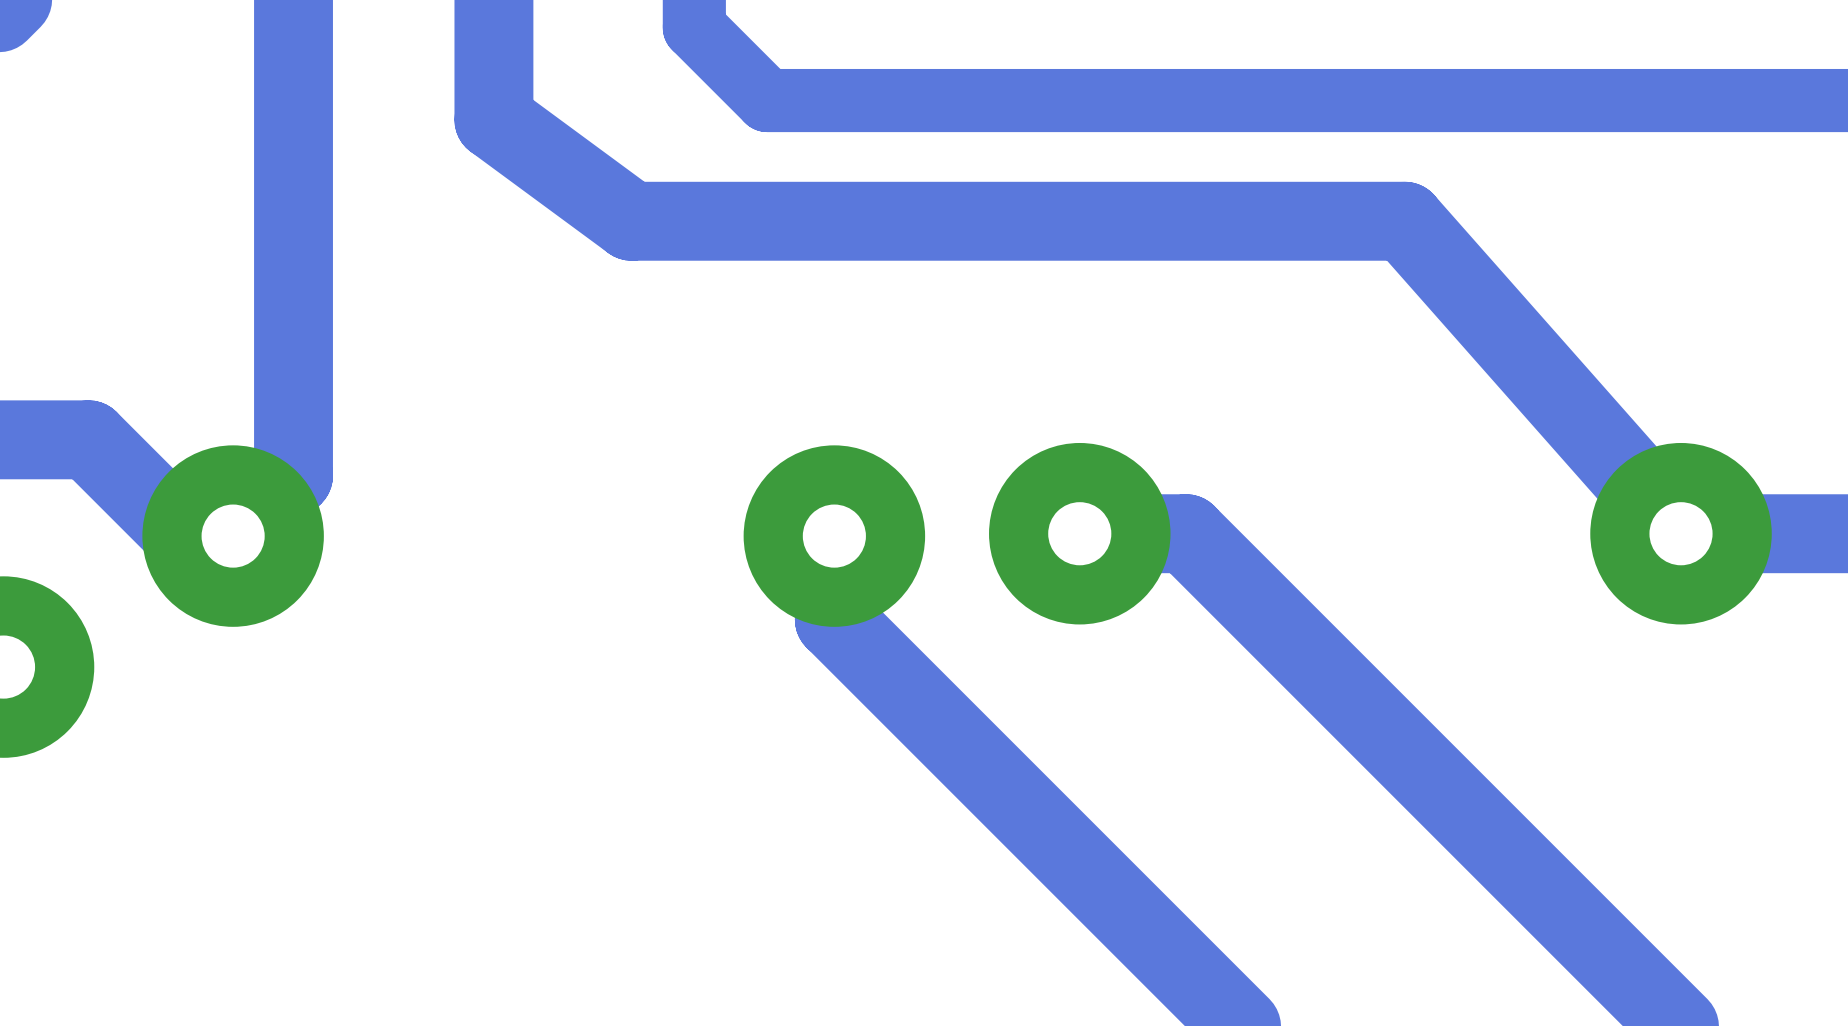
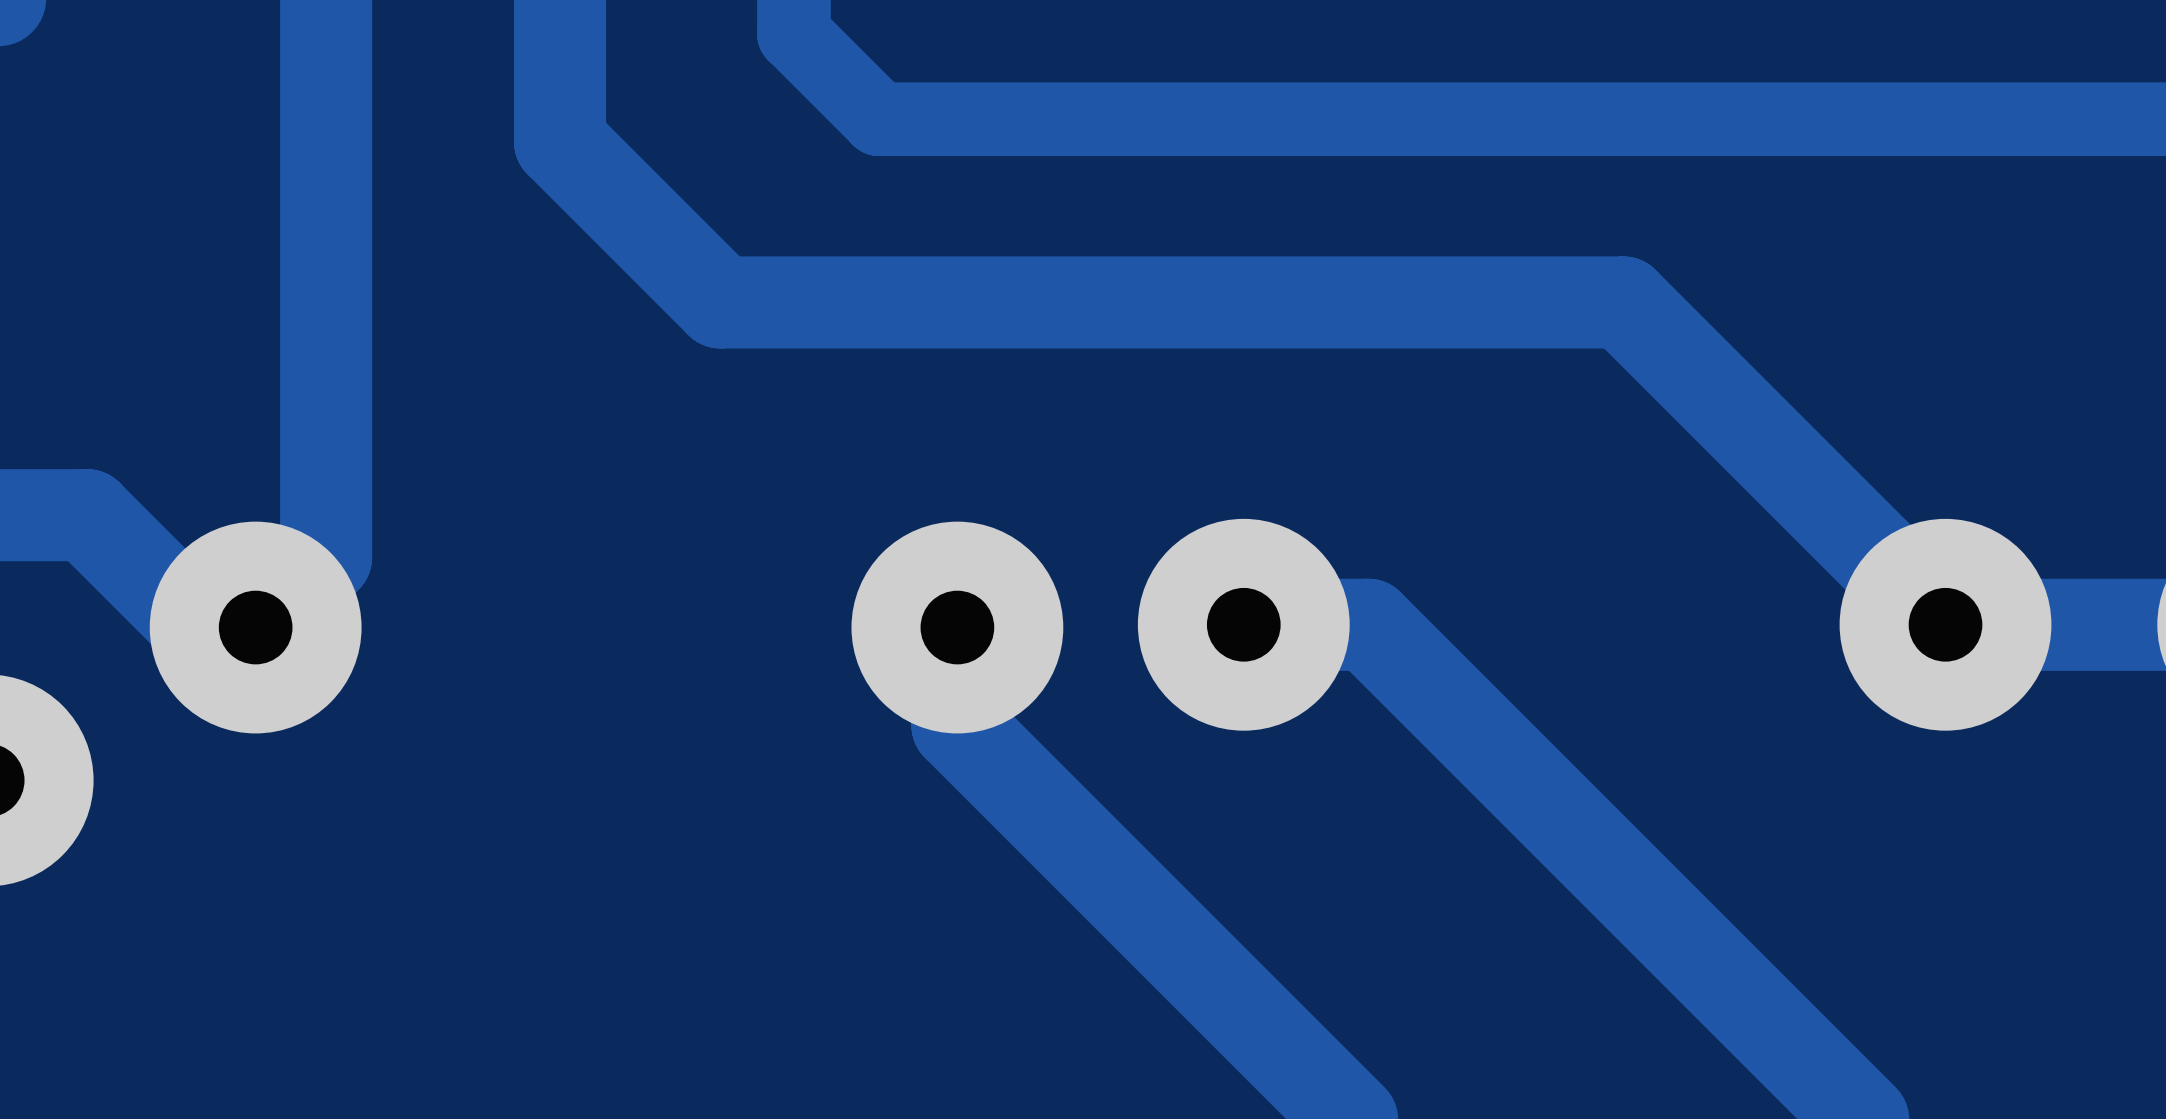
track: (493, 119) (631, 221) (1404, 221) (1681, 533) -> (560, 141) (720, 302) (1623, 302) (1945, 624)

